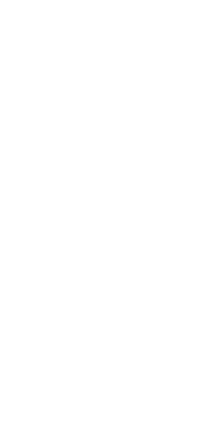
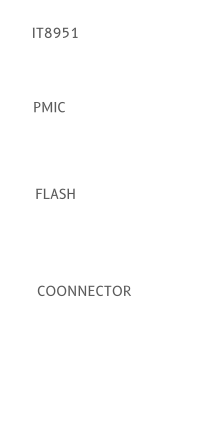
text: none -> IT8951 (55, 32)
text: none -> PMIC (49, 107)
text: none -> FLASH (55, 193)
text: none -> COONNECTOR (84, 290)

